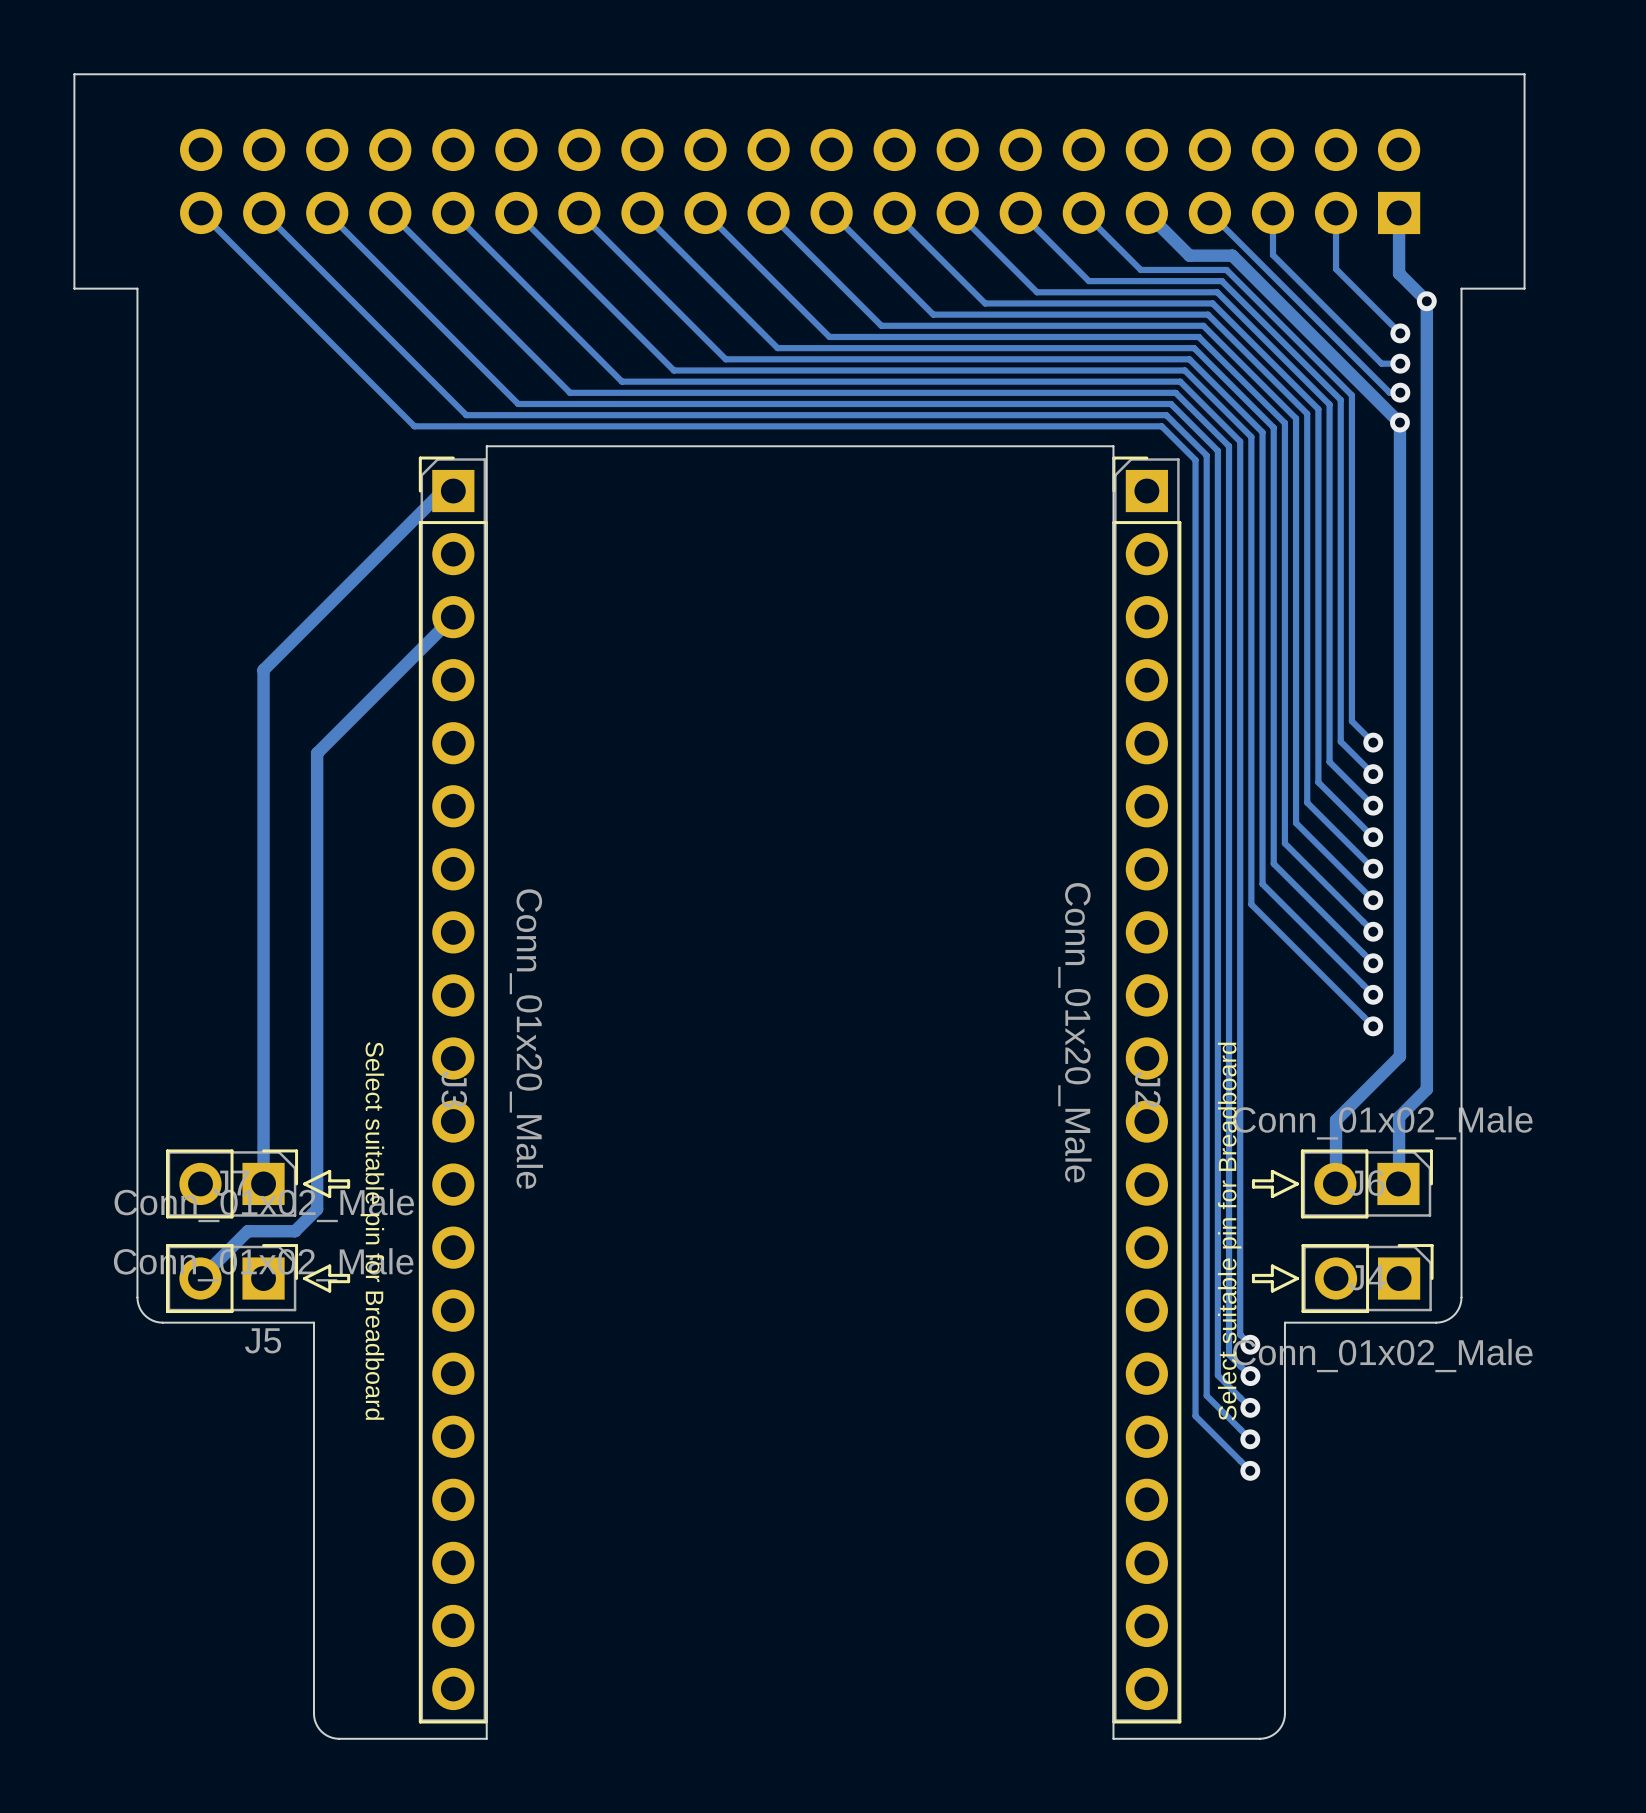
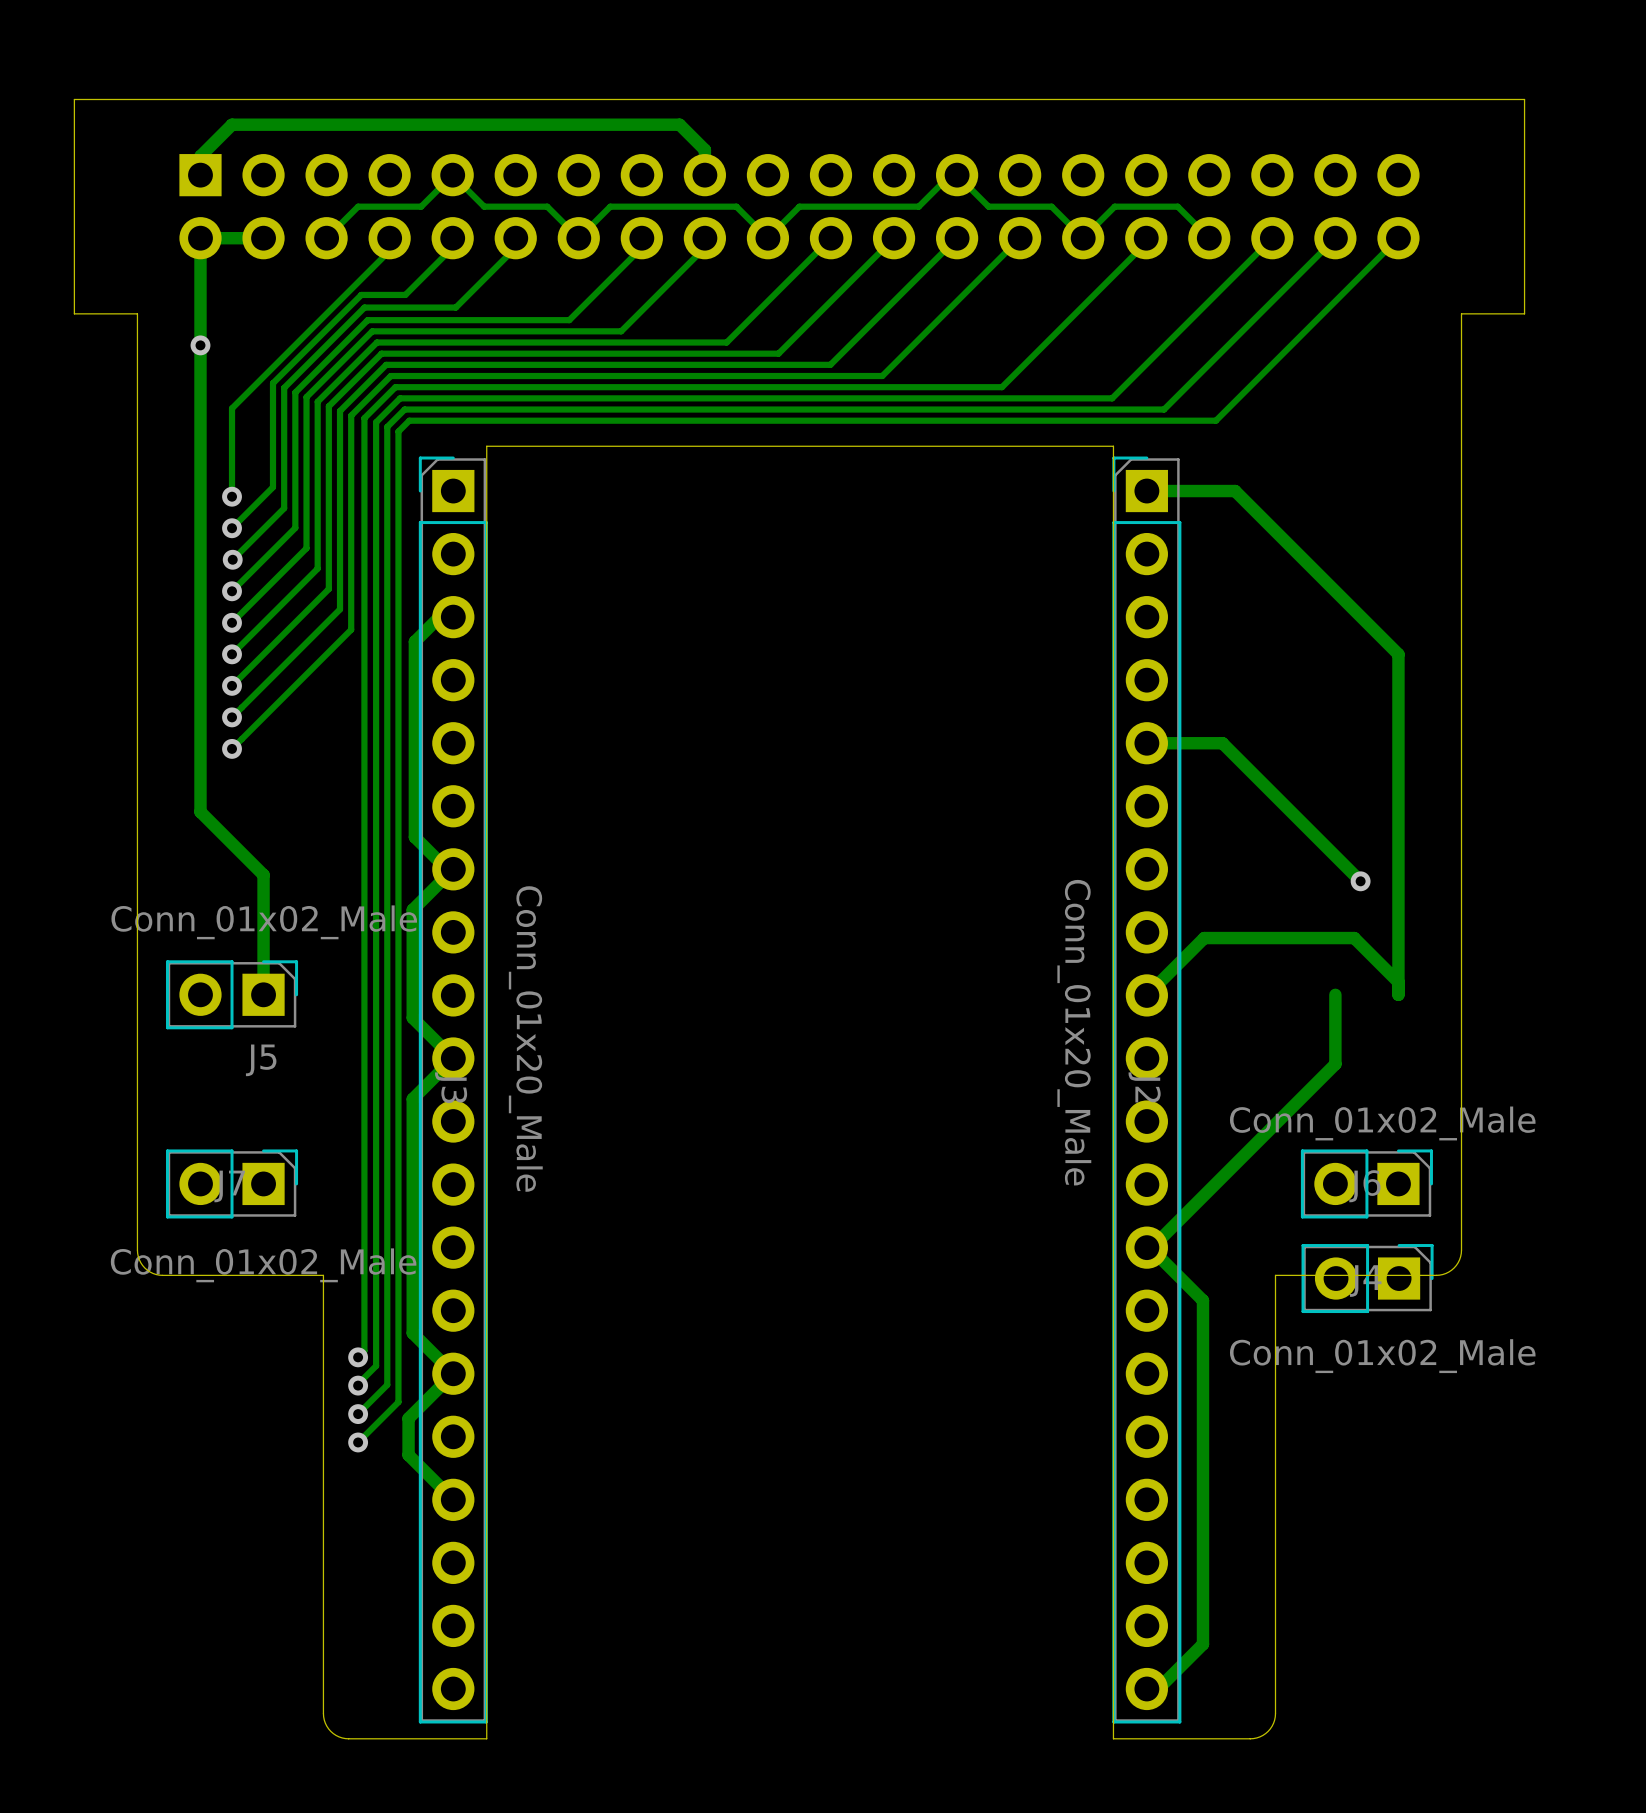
board edge: (1524, 99) (1524, 74) (74, 74) (74, 99) -> (1524, 99) (74, 99)
track: none -> (704, 175) (704, 149) (679, 124) (232, 124) (200, 156) (200, 175)
part rotation: 0° (800, 181) -> 180° (799, 206)
track: (201, 212) (414, 426) (1161, 426) (1195, 460) (1195, 1416) (1250, 1470) -> none
track: (264, 212) (466, 415) (1166, 415) (1206, 455) (1206, 1395) (1250, 1439) -> none
track: (327, 212) (518, 403) (1171, 403) (1217, 450) (1217, 1375) (1250, 1407) -> none
track: (390, 212) (570, 392) (1175, 392) (1229, 446) (1229, 1354) (1250, 1376) -> none
track: (453, 212) (622, 381) (1180, 381) (1240, 441) (1240, 1334) (1250, 1344) -> none
track: (516, 212) (673, 370) (1184, 370) (1251, 436) (1251, 904) (1373, 1026) -> none
track: (579, 212) (725, 359) (1189, 359) (1262, 432) (1262, 884) (1373, 994) -> none
track: (642, 212) (777, 348) (1194, 348) (1273, 427) (1273, 863) (1373, 963) -> none
track: (705, 212) (829, 336) (1198, 336) (1284, 423) (1284, 843) (1373, 931) -> none
track: (768, 212) (881, 325) (1203, 325) (1296, 418) (1296, 823) (1373, 900) -> none
track: (831, 212) (933, 314) (1208, 314) (1307, 413) (1307, 802) (1373, 868) -> none
track: (894, 212) (985, 303) (1212, 303) (1318, 409) (1318, 782) (1373, 837) -> none
track: (957, 212) (1037, 292) (1217, 292) (1329, 404) (1329, 761) (1373, 805) -> none
track: (1020, 212) (1088, 281) (1221, 281) (1340, 399) (1340, 741) (1373, 774) -> none
track: (1083, 212) (1140, 269) (1226, 269) (1351, 395) (1351, 721) (1373, 742) -> none
track: (1146, 212) (1189, 255) (1232, 255) (1399, 422) (1399, 1056) (1336, 1120) (1335, 1183) -> none
track: (1209, 212) (1389, 392) (1400, 392) -> none
track: (1272, 212) (1272, 255) (1381, 363) (1400, 363) -> none
track: (1336, 212) (1336, 269) (1400, 333) -> none
track: (1399, 212) (1399, 273) (1426, 301) (1426, 1089) (1399, 1117) (1398, 1183) -> none
track: none -> (389, 238) (389, 250) (232, 408) (232, 496)
track: none -> (440, 238) (452, 238) (452, 247) (405, 294) (361, 294) (273, 383) (273, 487) (232, 528)
track: none -> (515, 238) (515, 247) (455, 307) (364, 307) (284, 387) (284, 508) (232, 559)
track: none -> (641, 238) (641, 247) (569, 320) (367, 320) (295, 392) (295, 527) (232, 591)
track: none -> (704, 238) (704, 247) (621, 331) (372, 331) (306, 397) (306, 548) (232, 622)
track: none -> (831, 238) (726, 342) (376, 342) (317, 401) (317, 568) (232, 654)
track: none -> (894, 238) (778, 353) (381, 353) (328, 406) (328, 589) (232, 685)
track: none -> (957, 238) (830, 364) (386, 364) (340, 411) (340, 609) (232, 717)
track: none -> (1020, 238) (882, 376) (390, 376) (351, 415) (351, 629) (232, 748)
track: none -> (1146, 238) (1146, 242) (1001, 387) (395, 387) (364, 418) (364, 1351) (358, 1357)
track: none -> (1209, 238) (1177, 206) (1114, 206) (1083, 238) (1051, 206) (988, 206) (957, 175) (950, 175) (918, 206) (799, 206) (767, 238) (736, 206) (610, 206) (578, 238) (547, 206) (484, 206) (452, 175) (421, 206) (358, 206) (326, 238)
track: none -> (1272, 238) (1112, 398) (400, 398) (376, 422) (376, 1365) (358, 1385)
track: none -> (1335, 238) (1164, 409) (404, 409) (387, 426) (387, 1384) (358, 1414)
track: none -> (1398, 238) (1215, 420) (409, 420) (398, 431) (398, 1402) (358, 1442)
board edge: (74, 288) (137, 288) (137, 313) -> (74, 288) (74, 313) (137, 313)
board edge: (1524, 288) (1461, 288) (1461, 313) -> (1524, 288) (1524, 313) (1461, 313)
via: (1426, 301) -> none
via: (1400, 333) -> none
via: none -> (200, 345)
via: (1400, 363) -> none
via: (1400, 392) -> none
via: (1399, 422) -> none
track: (453, 491) (442, 491) (263, 670) (263, 875) -> (263, 238) (200, 238) (200, 811) (263, 875)
track: none -> (1146, 491) (1235, 491) (1398, 654) (1398, 994)
via: none -> (232, 496)
via: none -> (232, 528)
via: none -> (232, 559)
via: none -> (232, 591)
track: (453, 617) (317, 753) (317, 1209) (295, 1231) (247, 1231) (200, 1278) -> (453, 617) (439, 617) (414, 641) (414, 837) (447, 869) (453, 869) (412, 909) (412, 1017) (453, 1058) (412, 1099) (412, 1333) (453, 1373) (408, 1418) (408, 1455) (453, 1499)
via: none -> (232, 622)
via: none -> (232, 654)
via: none -> (232, 685)
via: none -> (232, 717)
via: (1373, 742) -> none
track: none -> (1146, 743) (1222, 743) (1360, 881)
via: none -> (232, 748)
via: (1373, 774) -> none
via: (1373, 805) -> none
via: (1373, 837) -> none
via: (1373, 868) -> none
via: none -> (1360, 881)
via: (1373, 900) -> none
via: (1373, 931) -> none
via: (1373, 963) -> none
track: none -> (1398, 982) (1354, 938) (1204, 938) (1146, 995)
track: (263, 994) (263, 1183) -> none
track: none -> (1335, 994) (1335, 1064) (1151, 1247) (1146, 1247)
via: (1373, 994) -> none
via: (1373, 1026) -> none
line: (329, 1171) (329, 1180) (348, 1180) (348, 1187) (329, 1187) (329, 1196) (304, 1183) (329, 1171) -> none
line: (1272, 1171) (1272, 1180) (1253, 1180) (1253, 1187) (1272, 1187) (1272, 1196) (1297, 1183) (1272, 1171) -> none
text: Select suitable pin for Breadboard (372, 1231) -> none
text: Select suitable pin for Breadboard (1229, 1231) -> none
track: none -> (1150, 1247) (1202, 1300) (1202, 1644) (1158, 1688) (1146, 1688)
board edge: (137, 1250) (138, 1303) (144, 1315) (153, 1320) (162, 1322) (313, 1322) (314, 1716) (319, 1728) (326, 1735) (335, 1738) (348, 1738) -> (137, 1250) (139, 1259) (144, 1267) (159, 1275) (323, 1275) (323, 1713) (325, 1723) (330, 1731) (339, 1736) (348, 1738)
board edge: (1461, 1250) (1460, 1303) (1456, 1312) (1445, 1320) (1436, 1322) (1284, 1322) (1284, 1716) (1281, 1726) (1272, 1735) (1263, 1738) (1250, 1738) -> (1461, 1250) (1456, 1265) (1448, 1272) (1439, 1275) (1275, 1275) (1275, 1713) (1273, 1723) (1268, 1731) (1259, 1736) (1250, 1738)
line: (329, 1265) (329, 1275) (348, 1275) (348, 1281) (329, 1281) (329, 1291) (304, 1278) (329, 1265) -> none
line: (1272, 1265) (1272, 1275) (1253, 1275) (1253, 1281) (1272, 1281) (1272, 1291) (1297, 1278) (1272, 1265) -> none
J5 position: (232, 1278) -> (232, 994)
via: (1250, 1344) -> none
via: none -> (358, 1357)
via: (1250, 1376) -> none
via: none -> (358, 1385)
via: (1250, 1407) -> none
via: none -> (358, 1414)
via: (1250, 1439) -> none
via: none -> (358, 1442)
via: (1250, 1470) -> none

